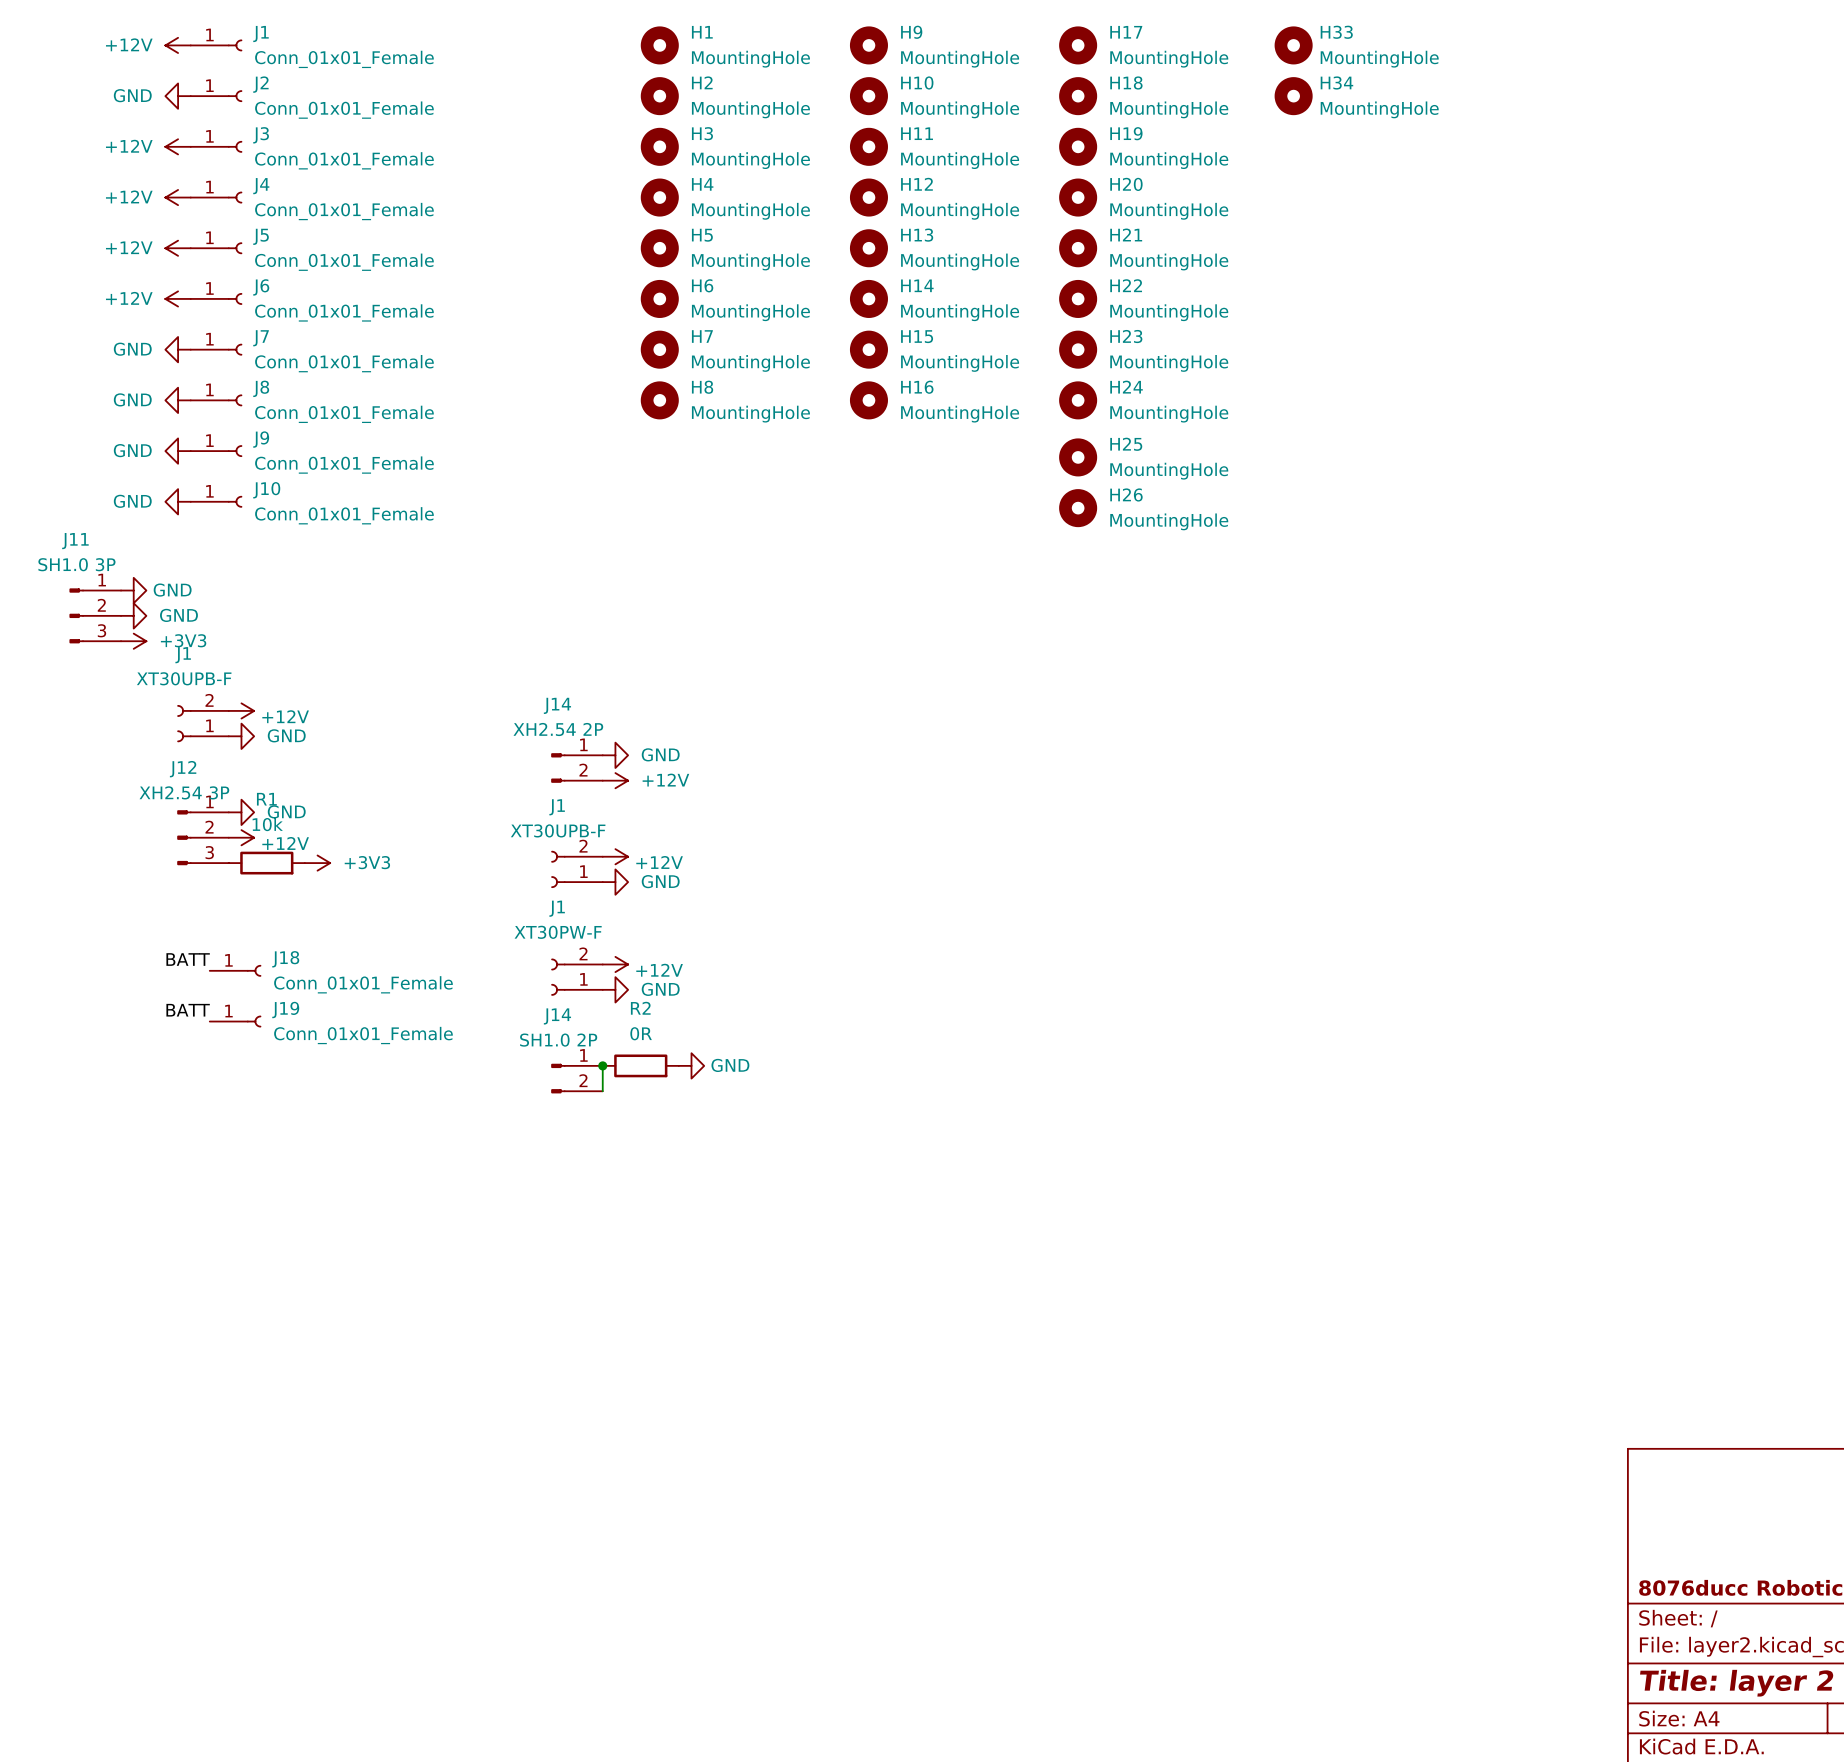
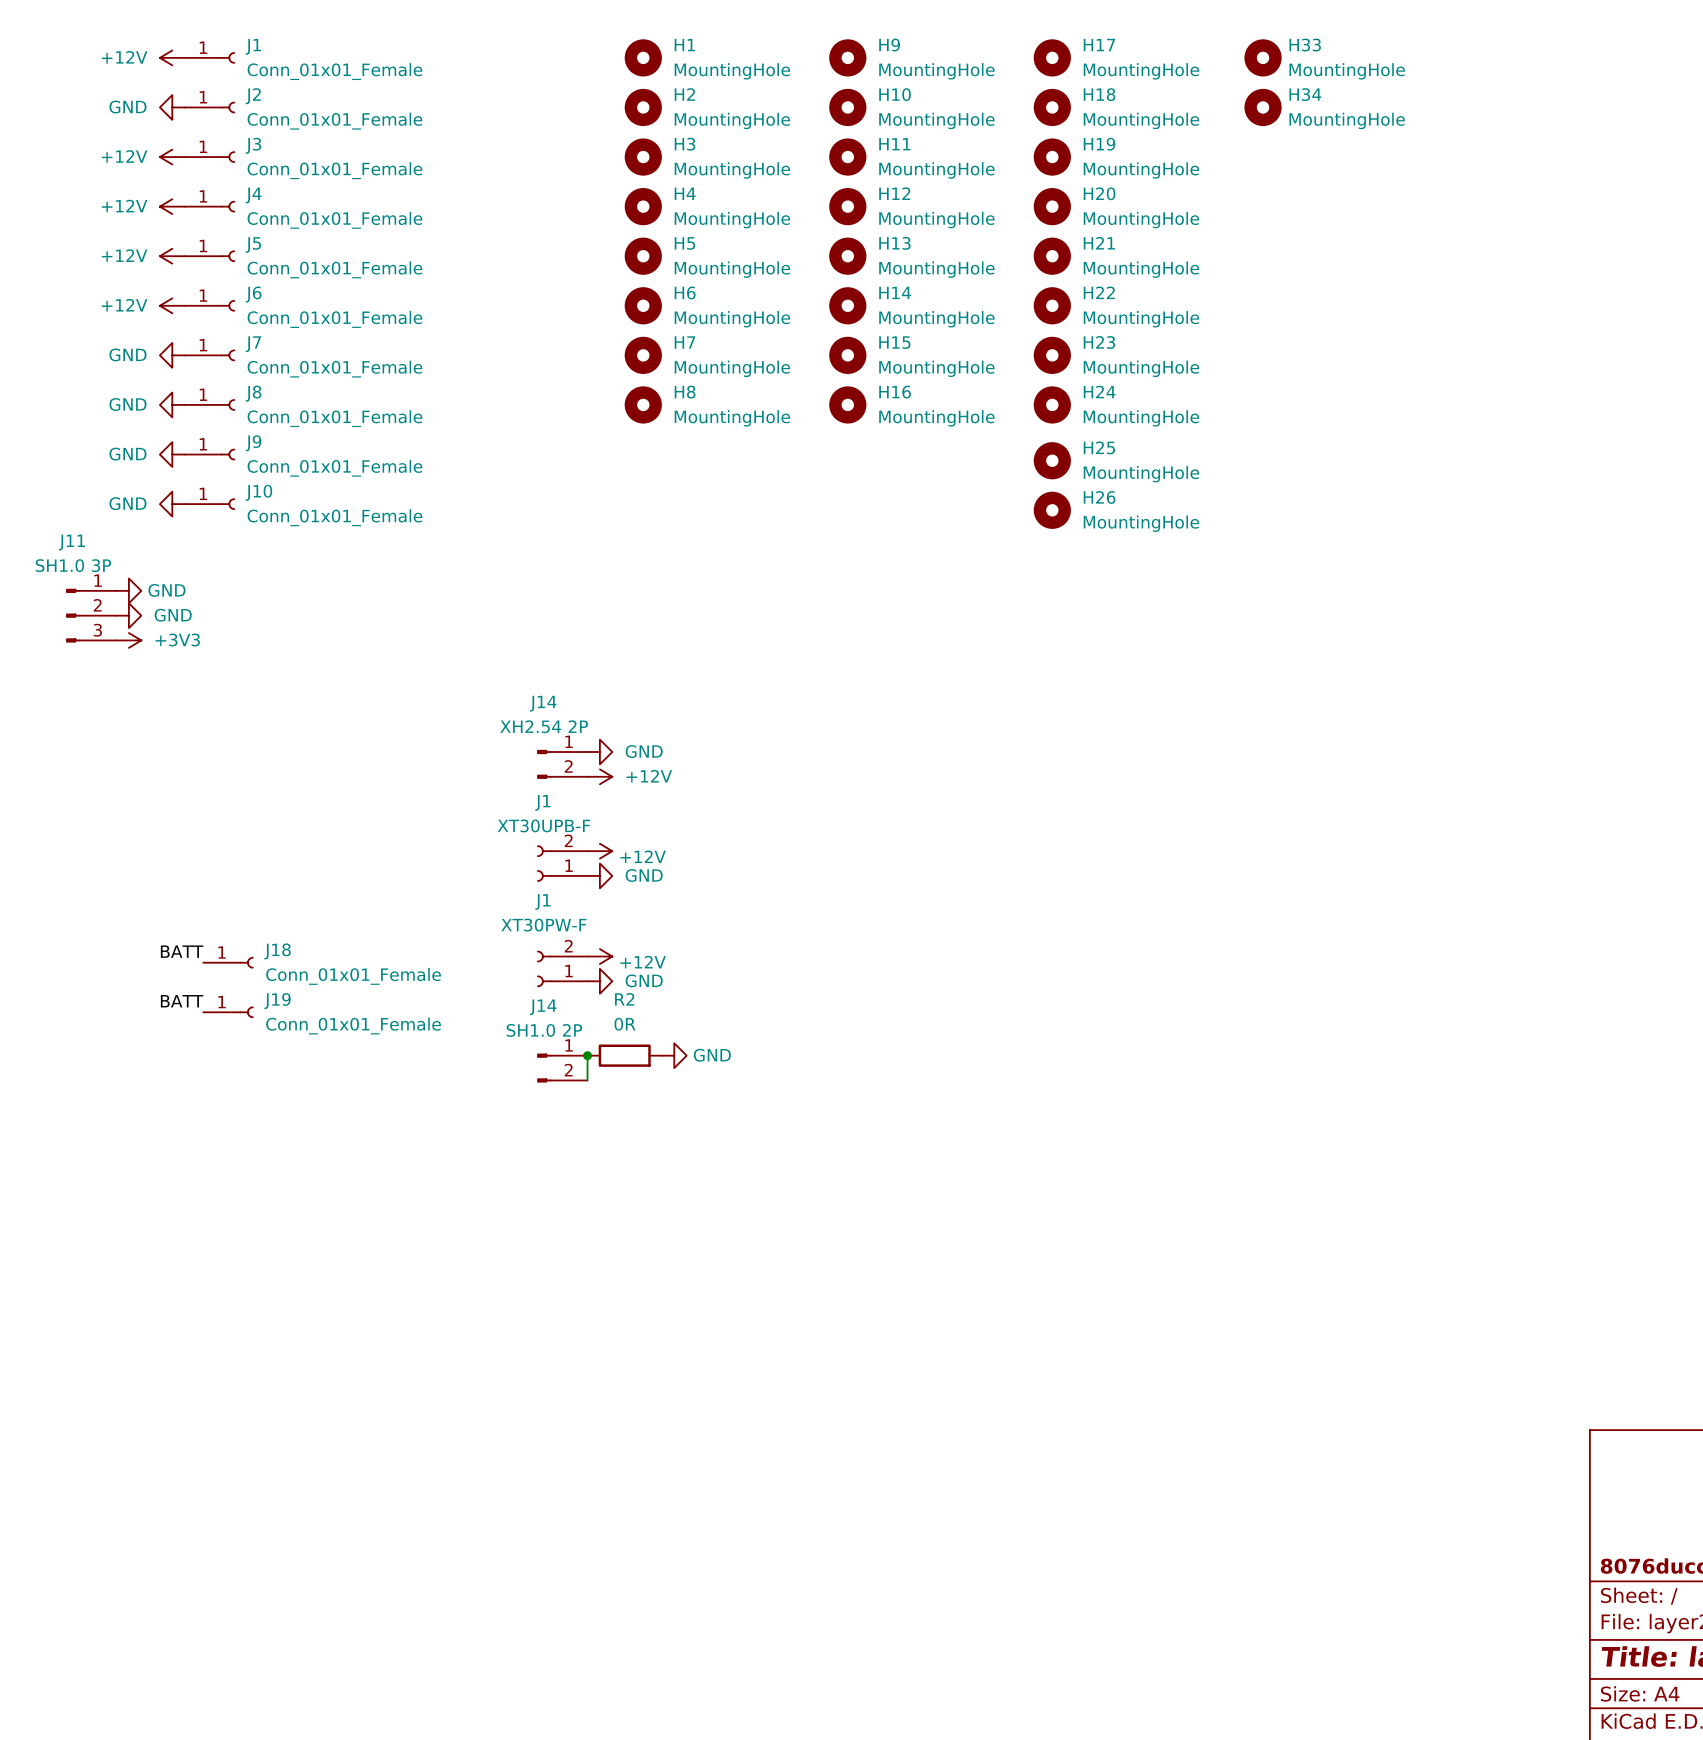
power symbol: +12V (241, 710) -> none
J1: XT30UPB-F (203, 723) -> none
power symbol: GND (241, 736) -> none
power symbol: GND (241, 812) -> none
J12: XH2.54 3P (203, 837) -> none
power symbol: +12V (241, 837) -> none
R1: 10k (266, 863) -> none
power symbol: +3V3 (317, 863) -> none

